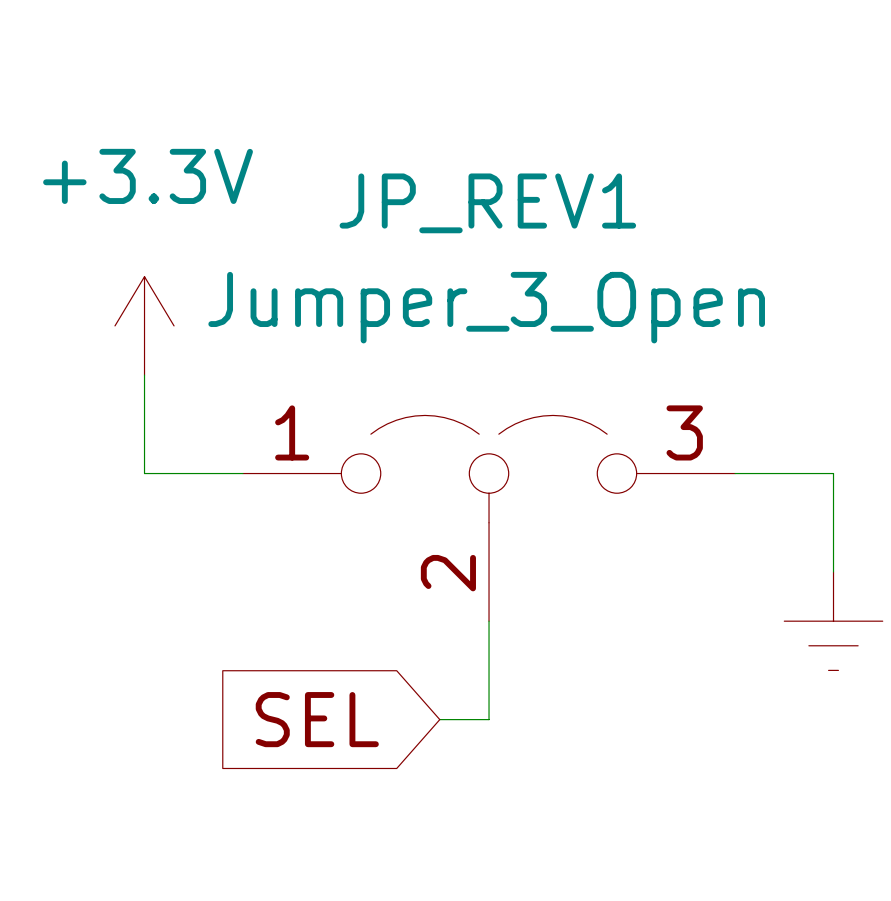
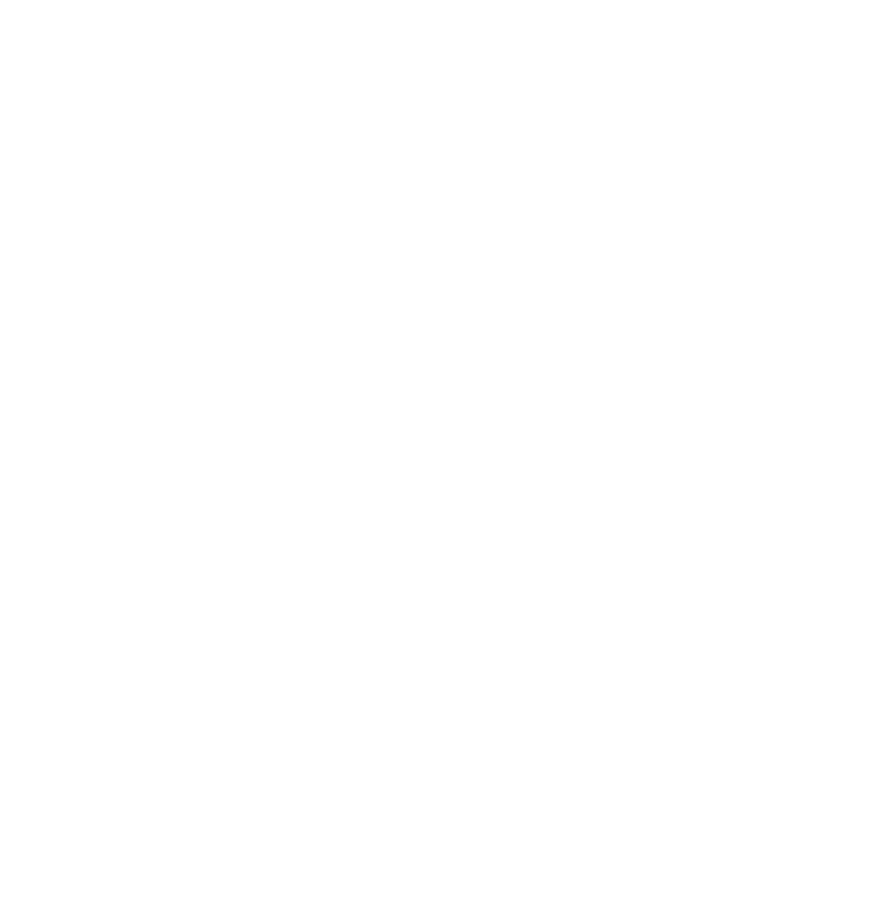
power symbol: +3.3V (144, 325) -> none
wire: (144, 375) (144, 473) (242, 473) -> none
wire: (735, 473) (833, 473) (833, 571) -> none
JP_REV1: Jumper_3_Open (489, 518) -> none
wire: (489, 621) (489, 719) (439, 719) -> none
power symbol: (833, 621) -> none
global label: SEL (317, 719) -> none

